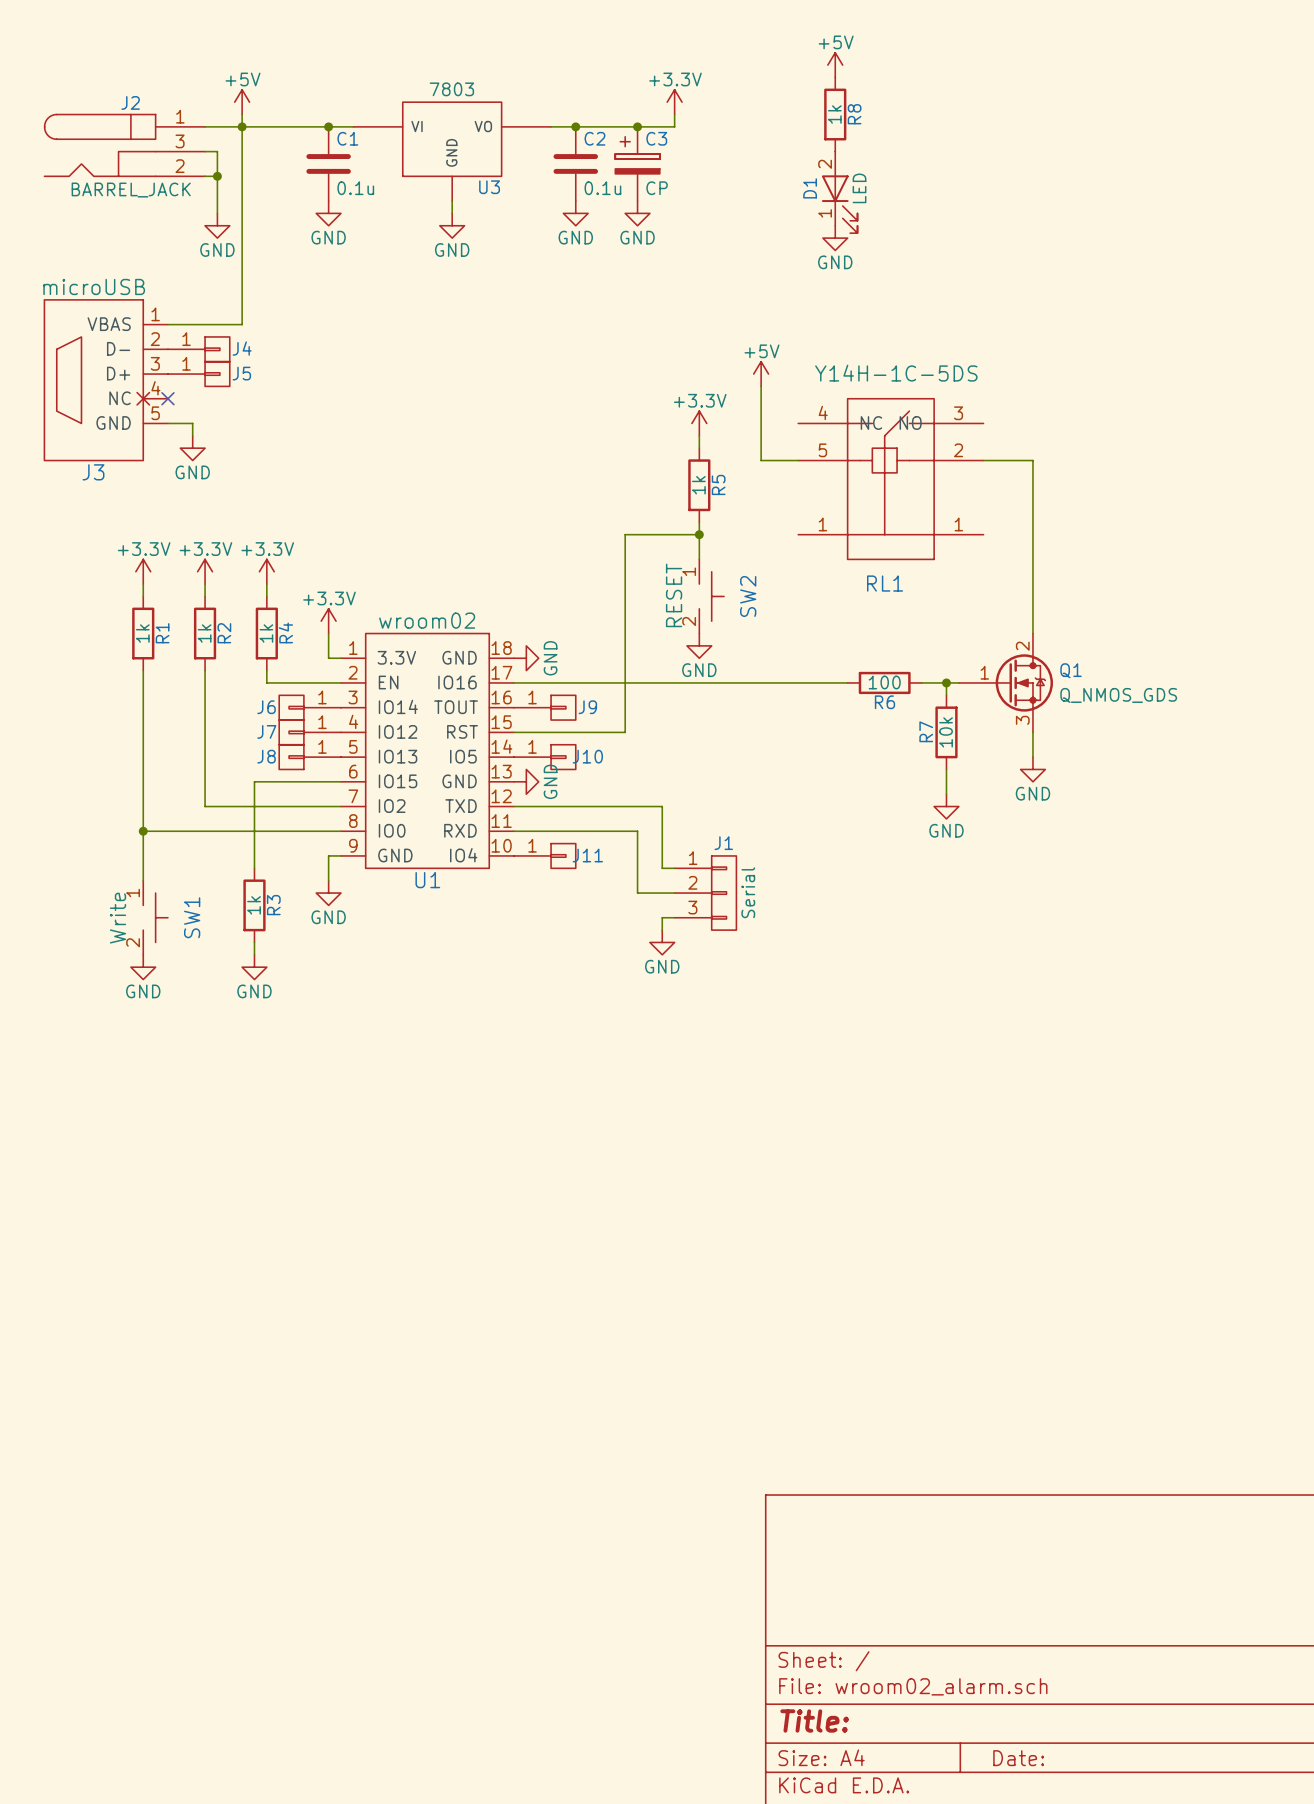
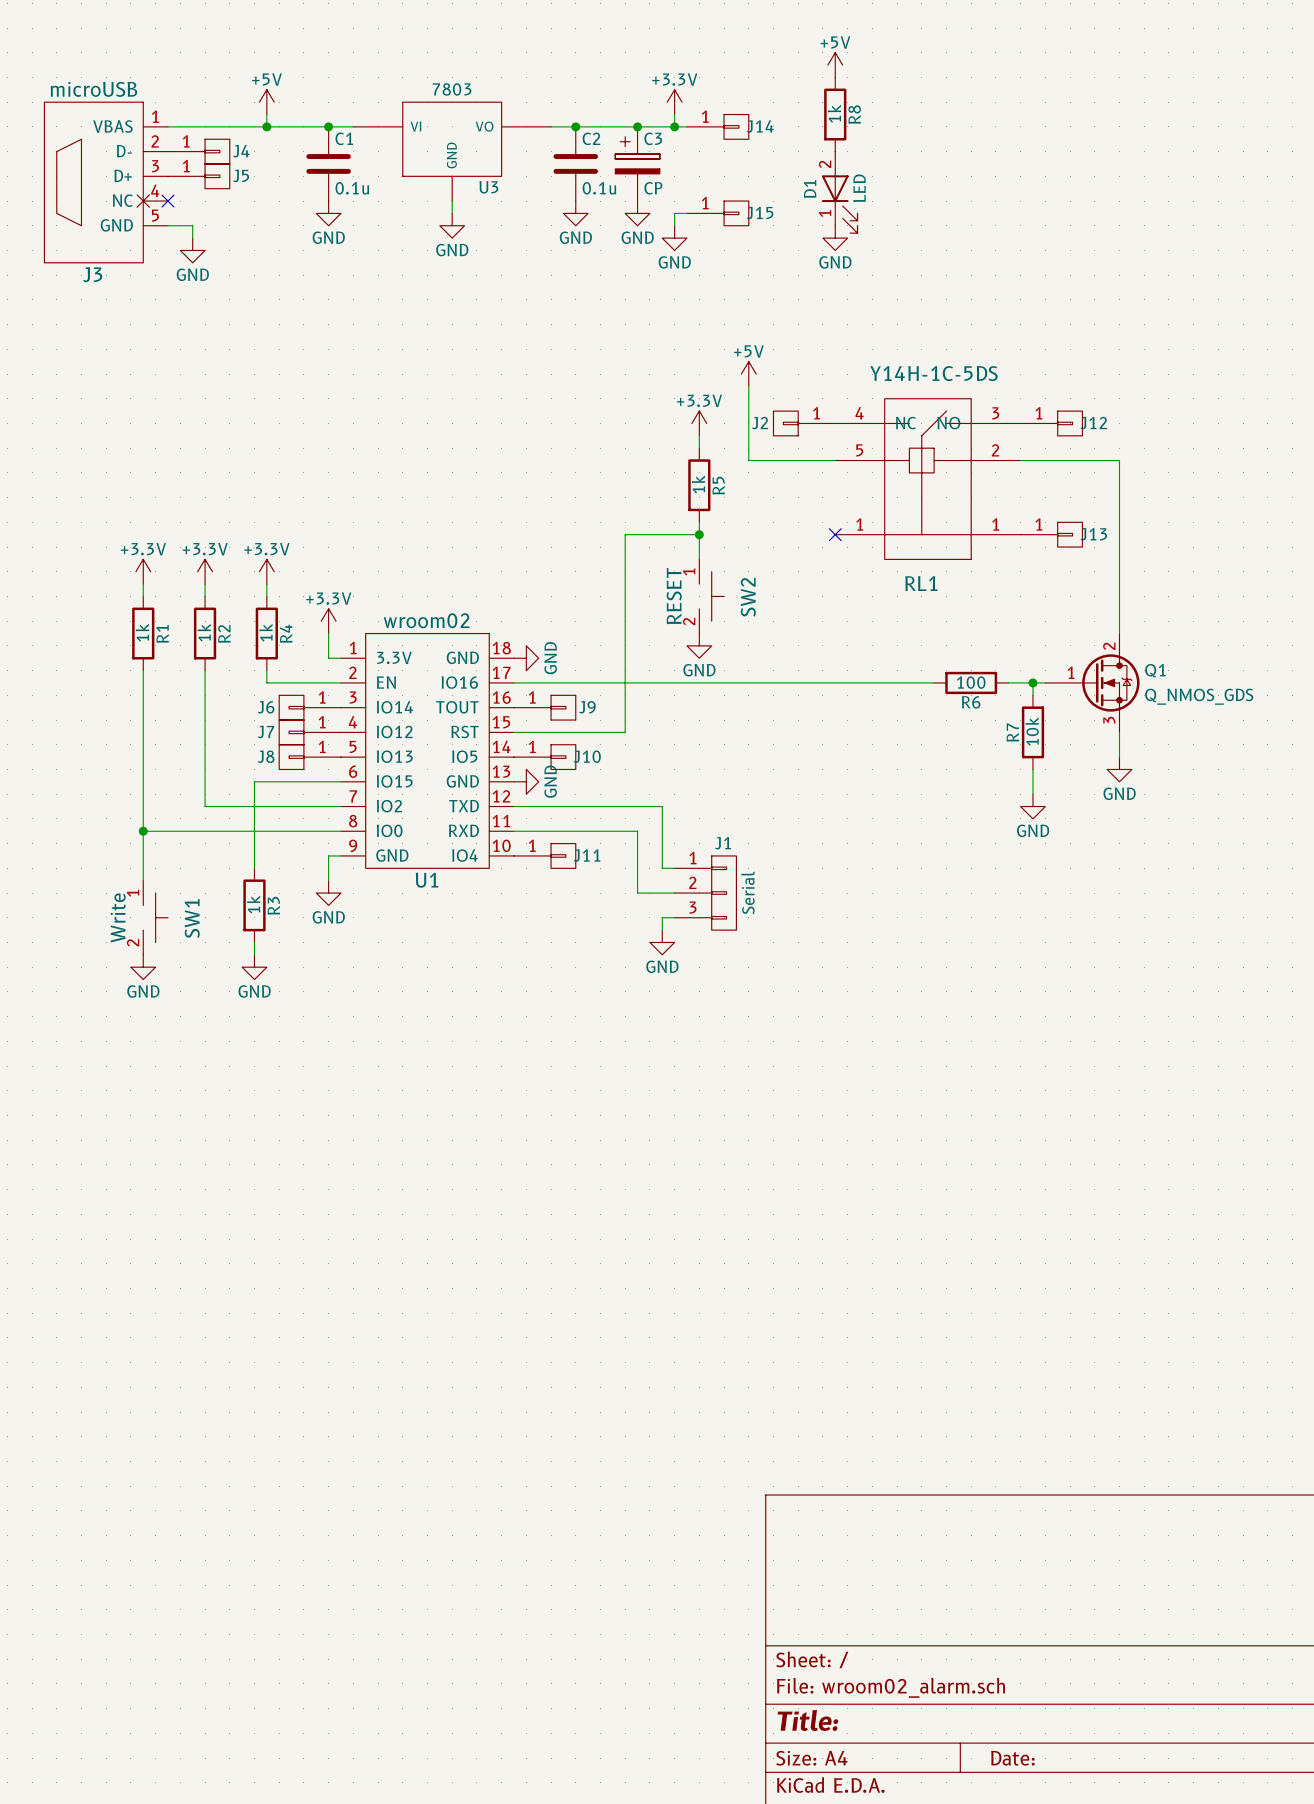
J2 name position: J2 (130, 102) -> J2 (760, 423)
power symbol position: +5V (242, 102) -> +5V (266, 102)
J2 symbol: [44, 114, 206, 177] -> [773, 411, 836, 436]
wire: (242, 114) (242, 324) (167, 324) -> none
wire: none -> (266, 114) (266, 126)
junction position: (242, 126) -> (266, 126)
wire: none -> (674, 126) (686, 126)
junction: none -> (674, 126)
J14: none -> (717, 126)
wire: (205, 151) (217, 151) (217, 213) -> none
junction: (217, 176) -> none
J2 value: BARREL_JACK (131, 190) -> none
no-connect mark: none -> (167, 201)
wire: none -> (686, 213) (674, 213) (674, 225)
J15: none -> (717, 213)
power symbol position: GND (217, 225) -> GND (192, 250)
power symbol: none -> GND (674, 238)
J4 position: (198, 349) -> (198, 151)
J5 position: (198, 374) -> (198, 176)
power symbol position: +5V (761, 374) -> +5V (748, 374)
J3 position: (106, 380) -> (106, 182)
wire: (761, 386) (761, 460) -> (748, 386) (748, 460) (761, 460)
no-connect mark: (167, 398) -> none
wire: (167, 423) (192, 423) (192, 435) -> (167, 225) (192, 225) (192, 238)
J12: none -> (1051, 423)
power symbol: GND (192, 448) -> none
wire: (1032, 460) (1032, 633) -> (1032, 460) (1119, 460) (1119, 633)
RL1 position: (890, 479) -> (927, 479)
no-connect mark: none -> (835, 534)
J13: none -> (1051, 534)
wire: none -> (847, 682) (921, 682)
R6 position: (884, 682) -> (971, 682)
junction: (946, 682) -> none
Q1 position: (1005, 682) -> (1092, 682)
junction: none -> (1032, 682)
R7 position: (946, 732) -> (1032, 732)
wire: (1032, 732) (1032, 757) -> (1119, 732) (1119, 757)
wire: (946, 769) (946, 794) -> (1032, 769) (1032, 794)
power symbol position: GND (1032, 769) -> GND (1032, 806)
power symbol: none -> GND (1119, 769)
power symbol: GND (946, 806) -> none

